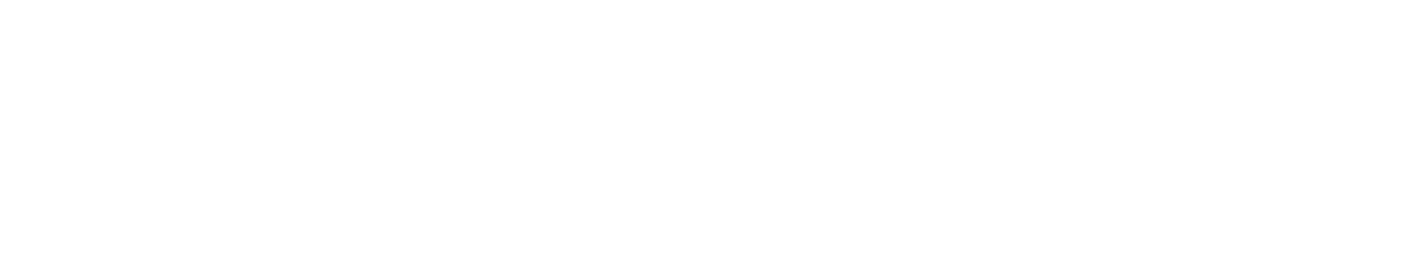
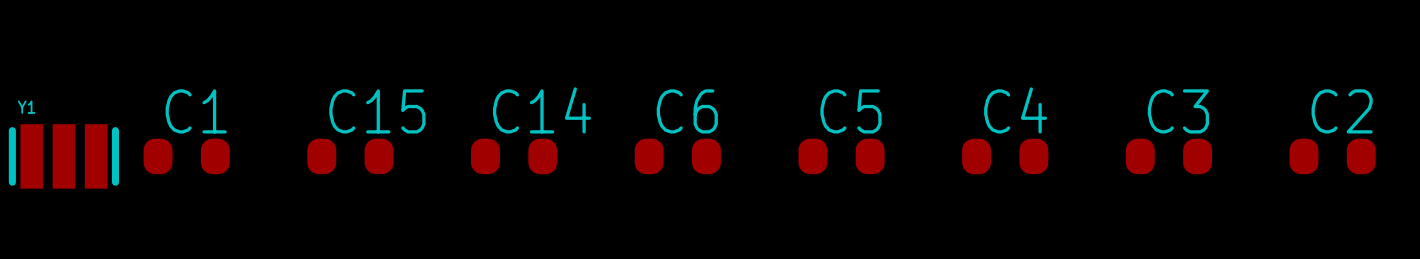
Y1: none -> (63, 156)
C1: none -> (186, 156)
C15: none -> (350, 156)
C14: none -> (514, 156)
C6: none -> (677, 156)
C5: none -> (841, 156)
C4: none -> (1005, 156)
C3: none -> (1168, 156)
C2: none -> (1332, 156)

